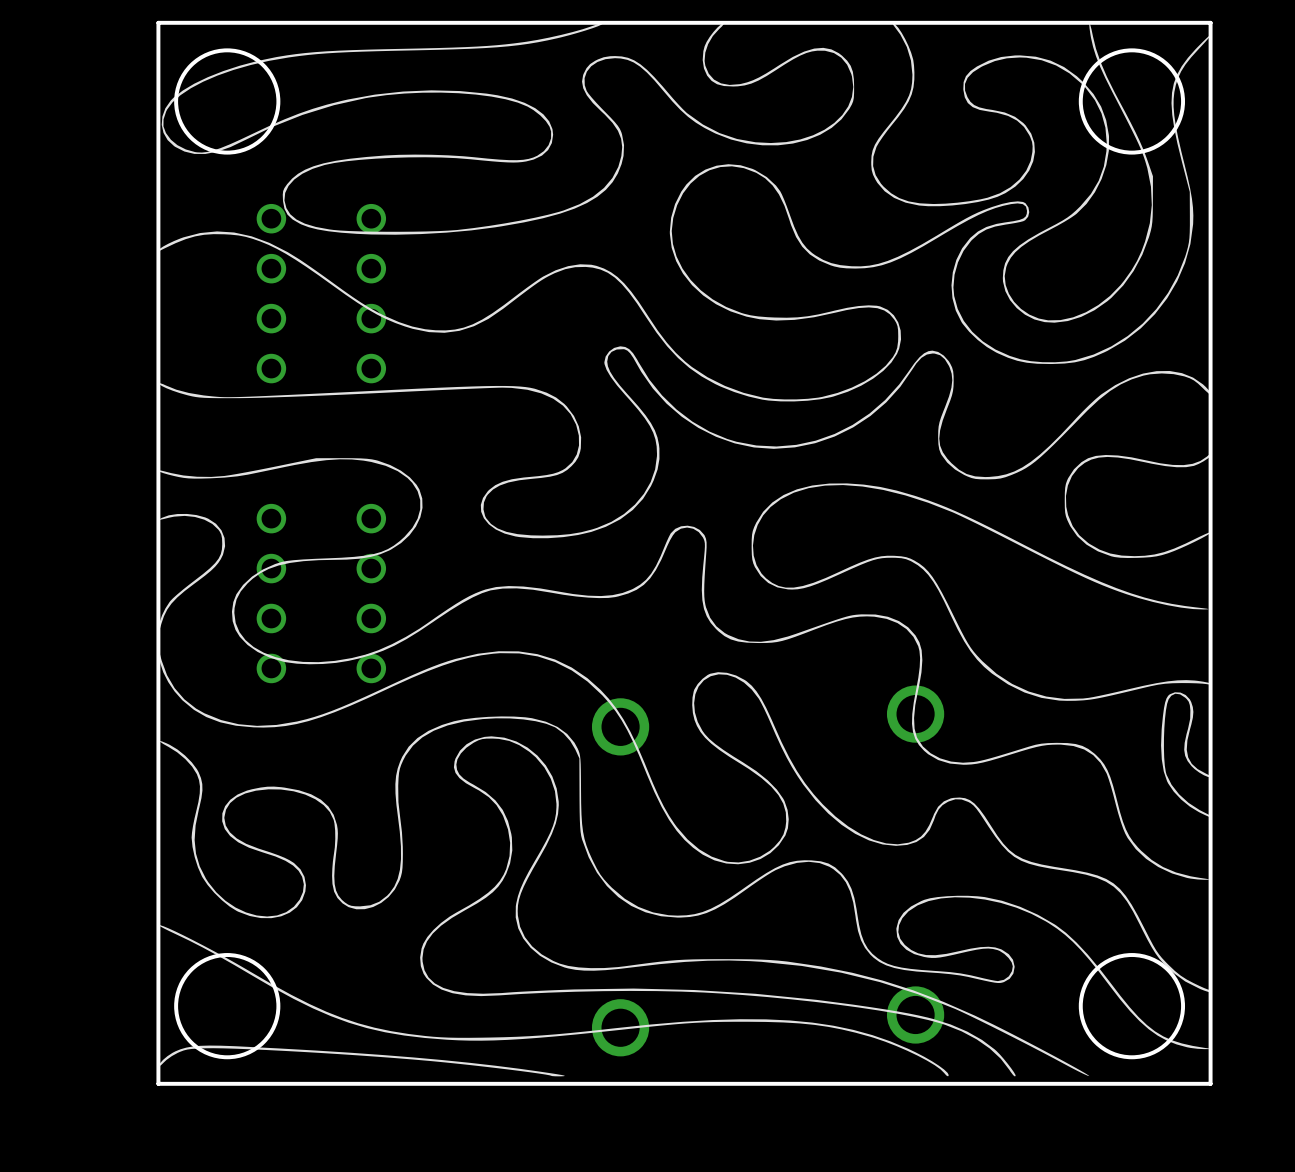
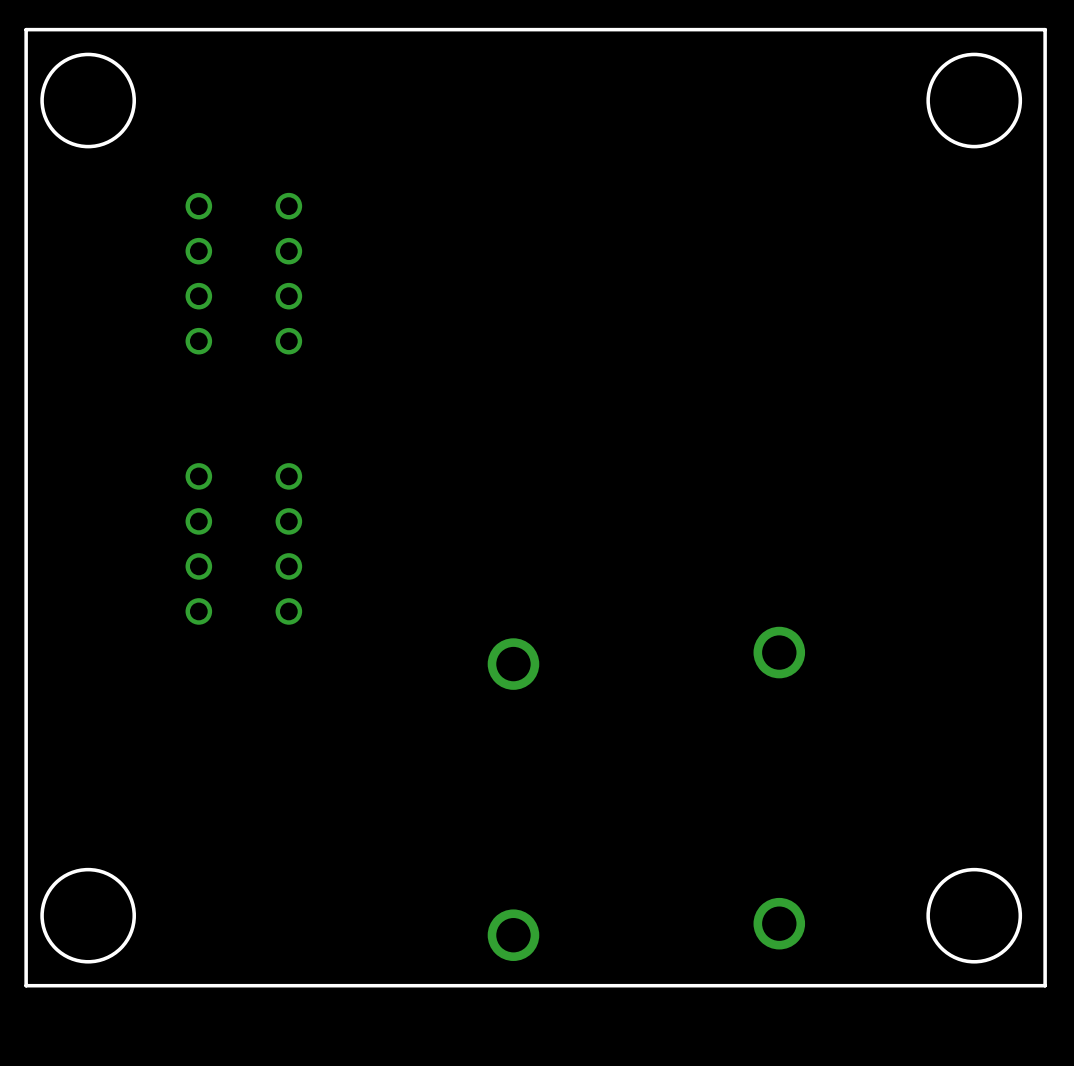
board edge: (158, 22) (158, 1083) -> (97, 29) (26, 29) (26, 985) (97, 985)
drawing: [158, 23, 1213, 1077] -> none
round board edge position: (227, 101) -> (88, 100)
round board edge position: (227, 1006) -> (88, 915)

